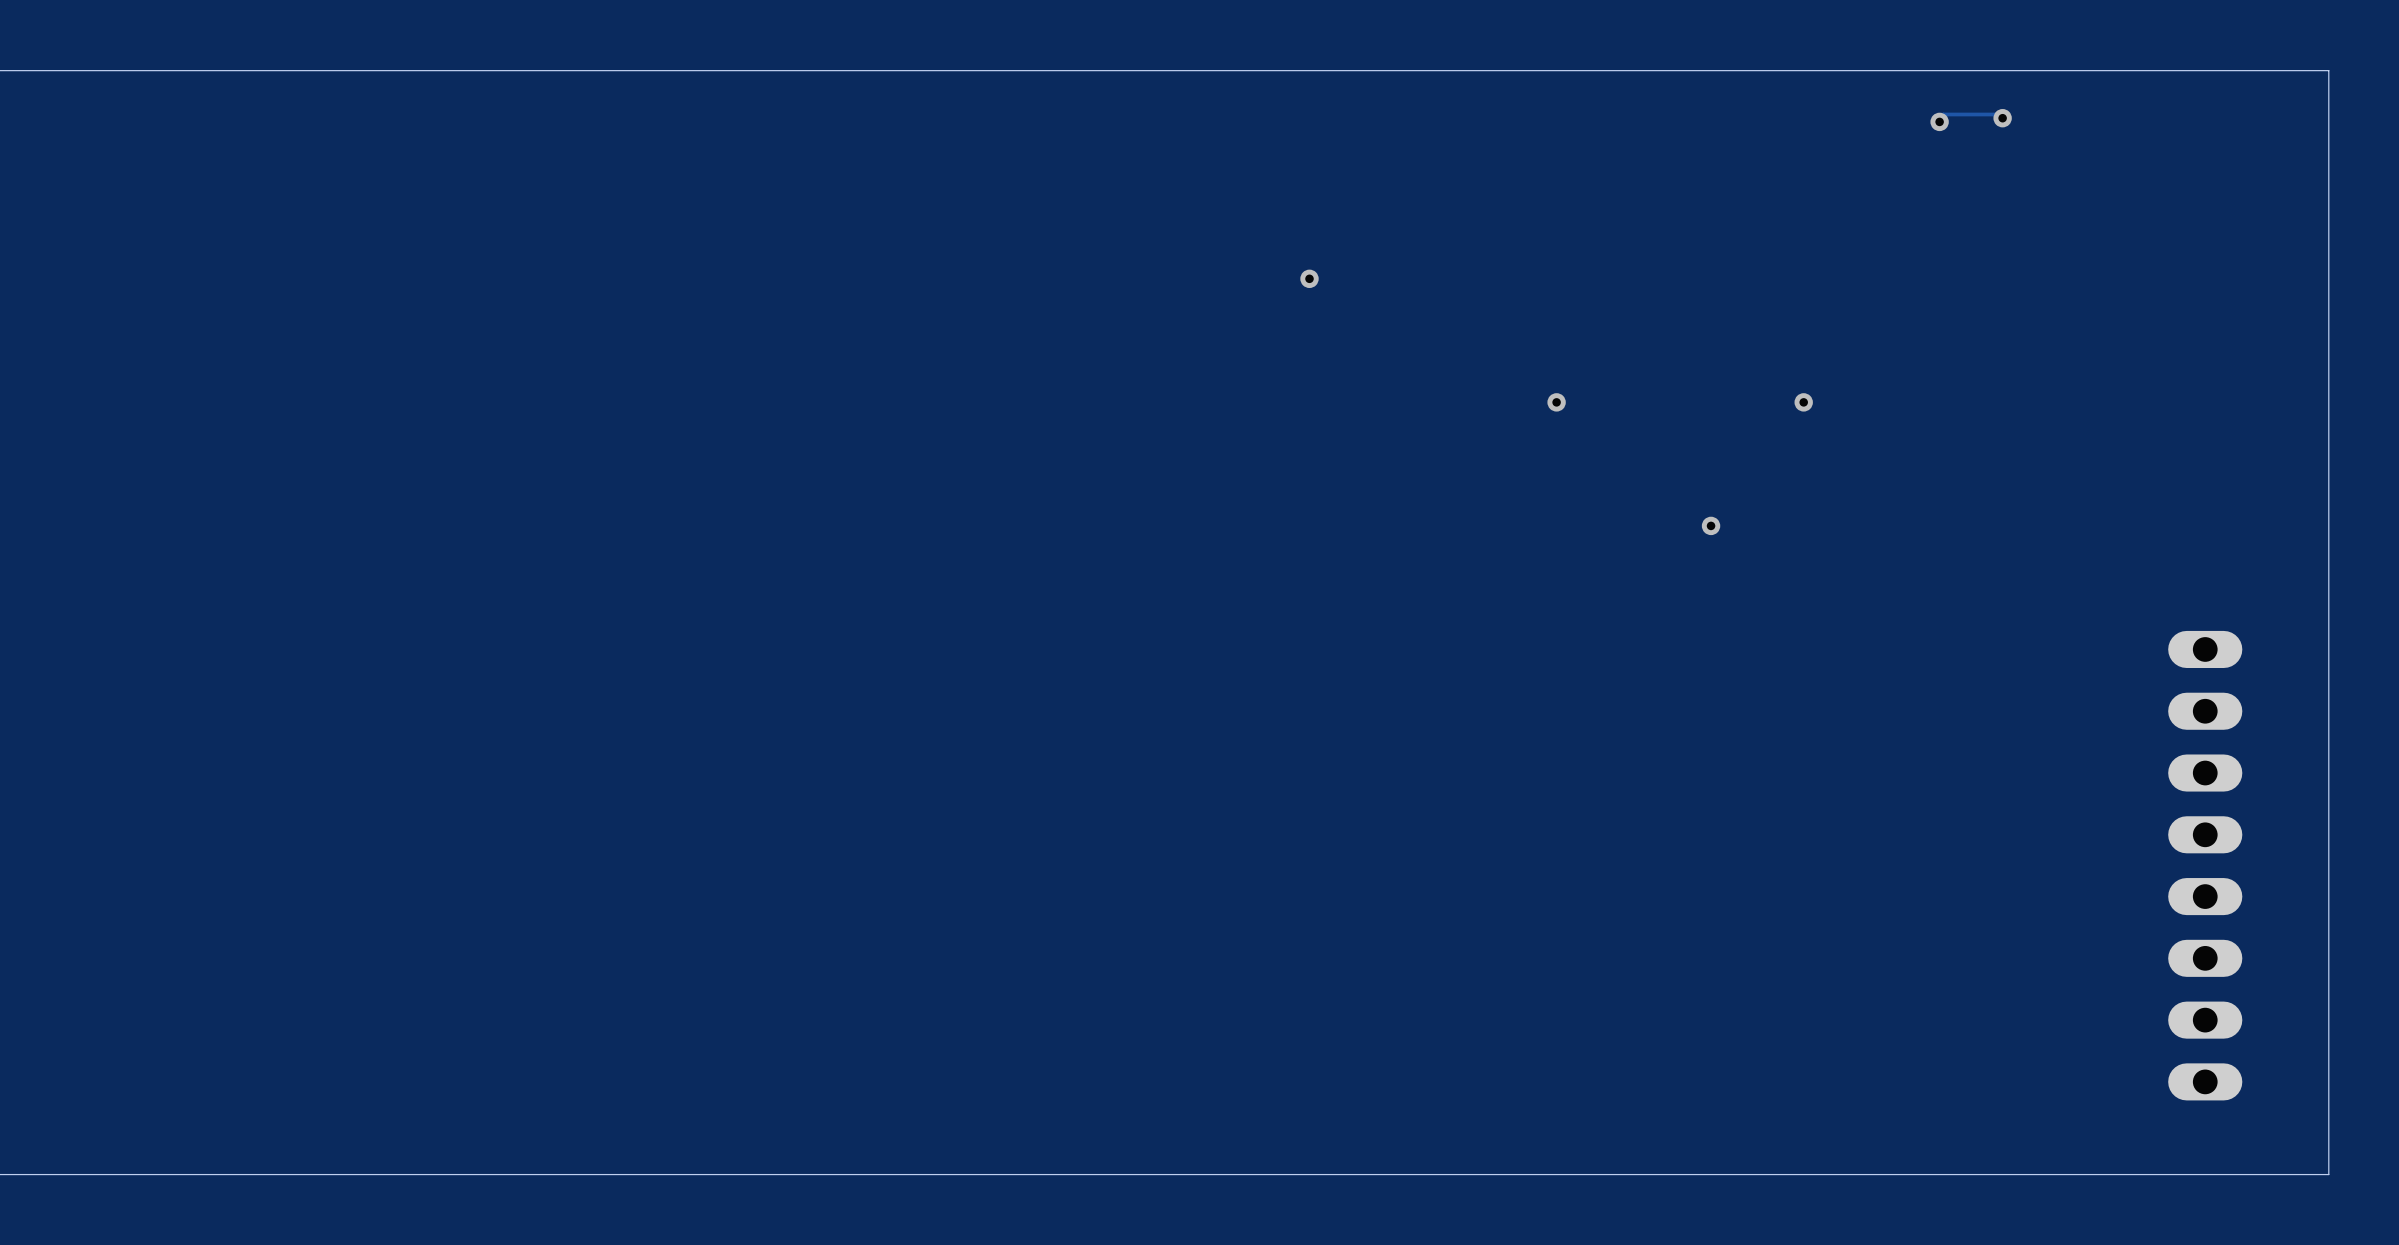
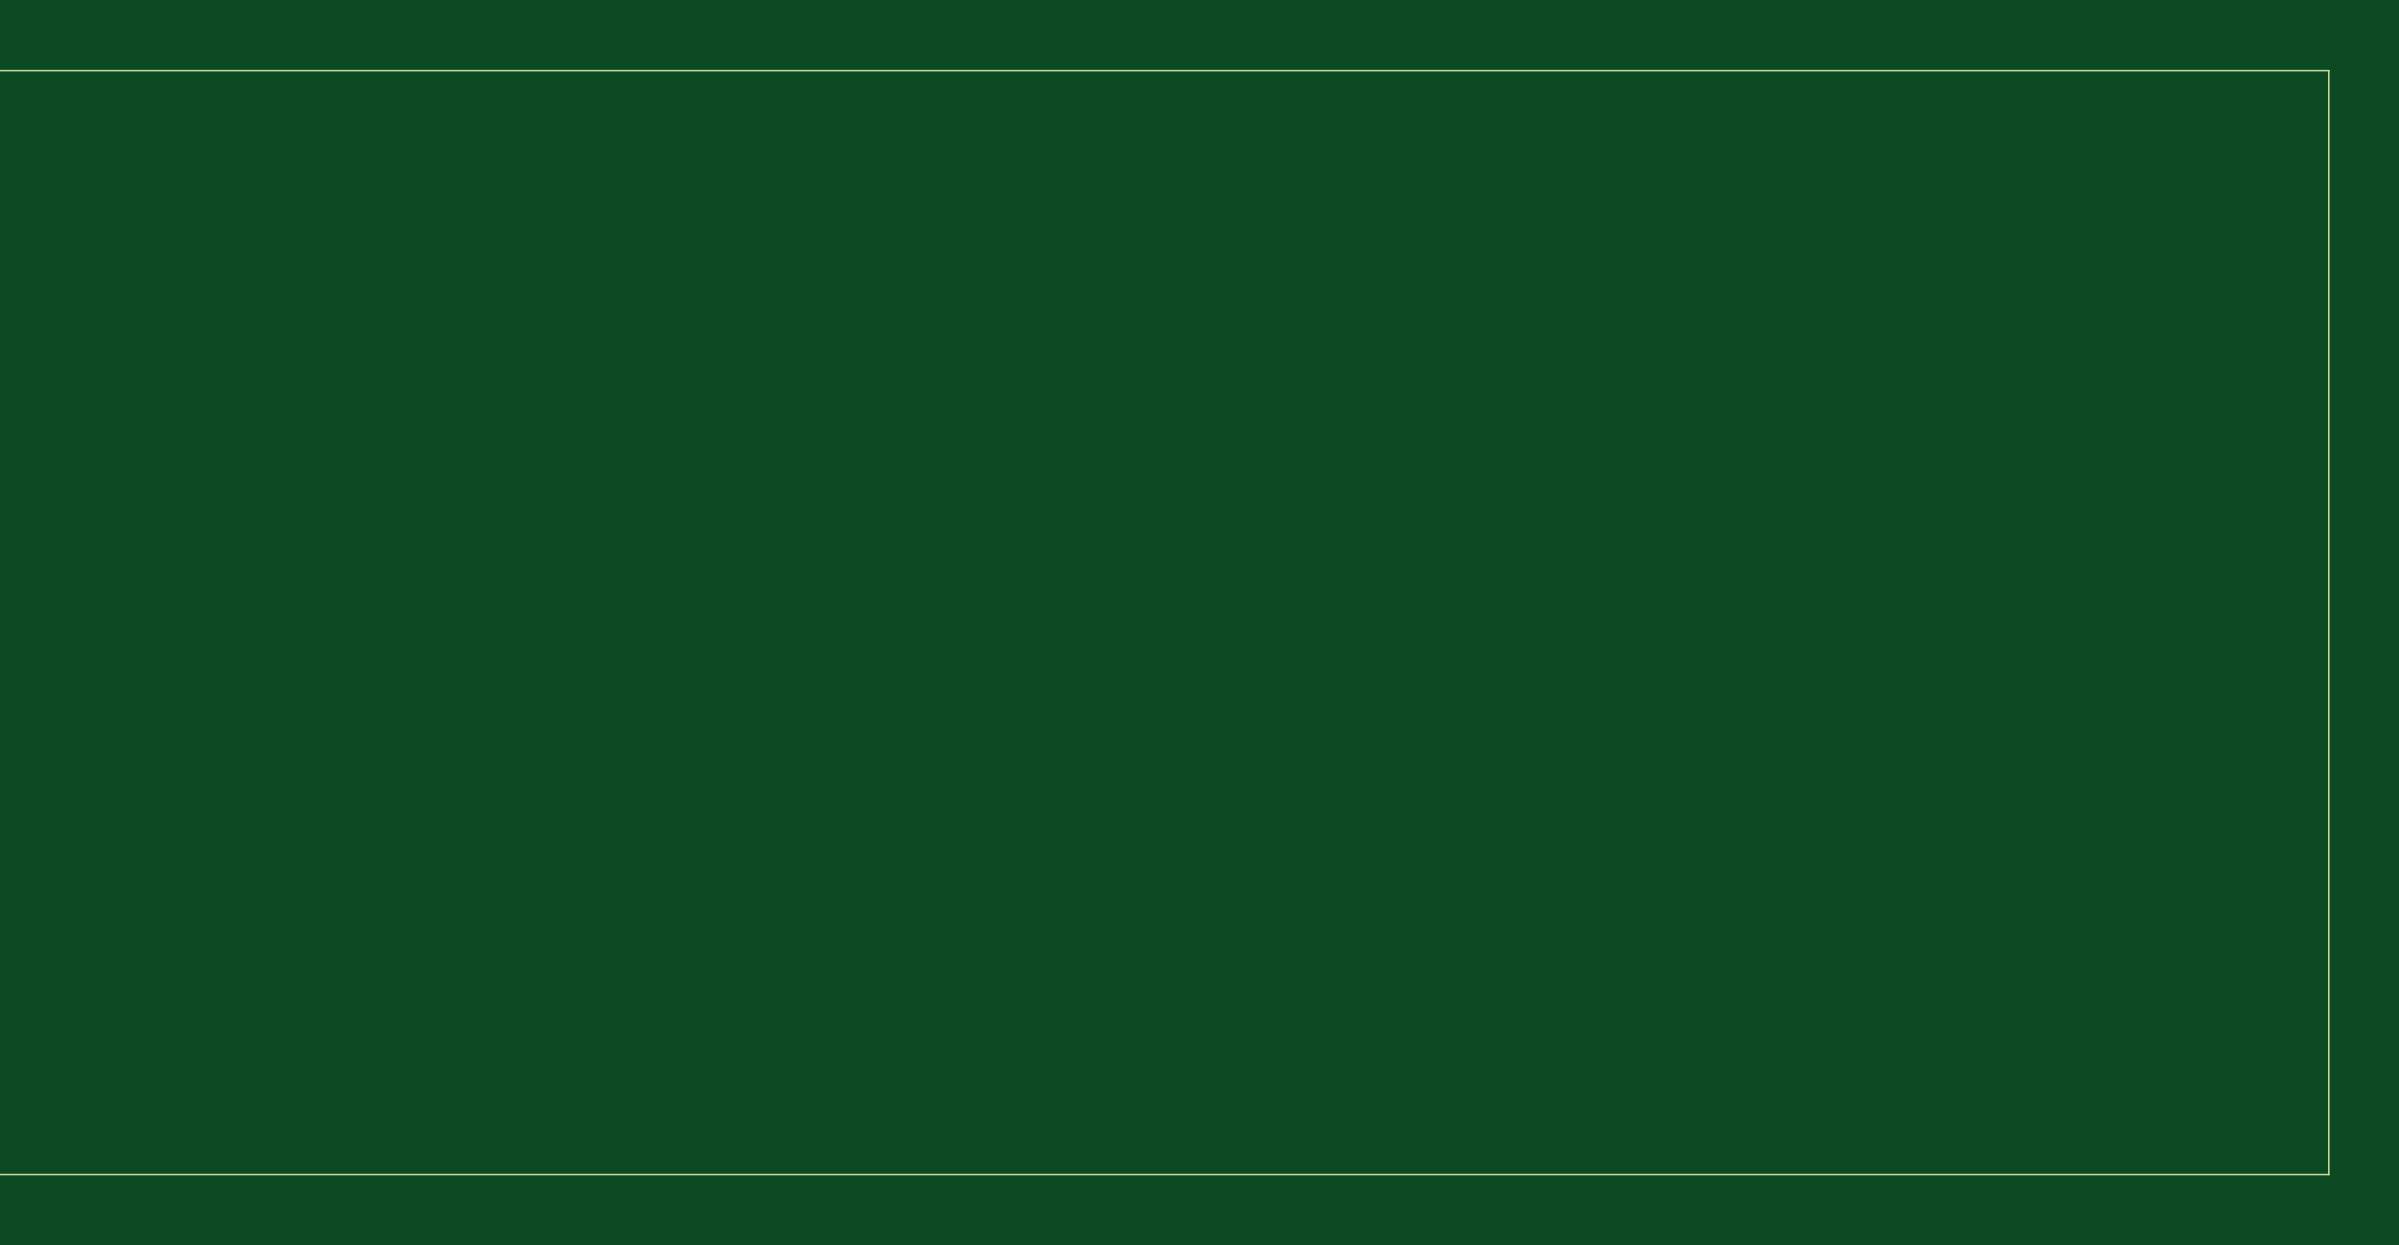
track: (2002, 118) (1998, 114) (1943, 114) (1939, 118) (1939, 121) -> none
via: (2002, 118) -> none
via: (1939, 121) -> none
via: (1309, 278) -> none
via: (1556, 402) -> none
via: (1803, 402) -> none
via: (1711, 525) -> none
part: (2205, 865) -> none

